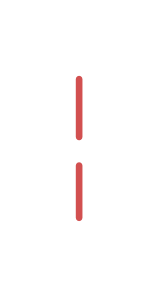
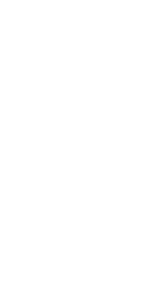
top track: (79, 79) (79, 136) -> none
top track: (79, 165) (79, 217) -> none

